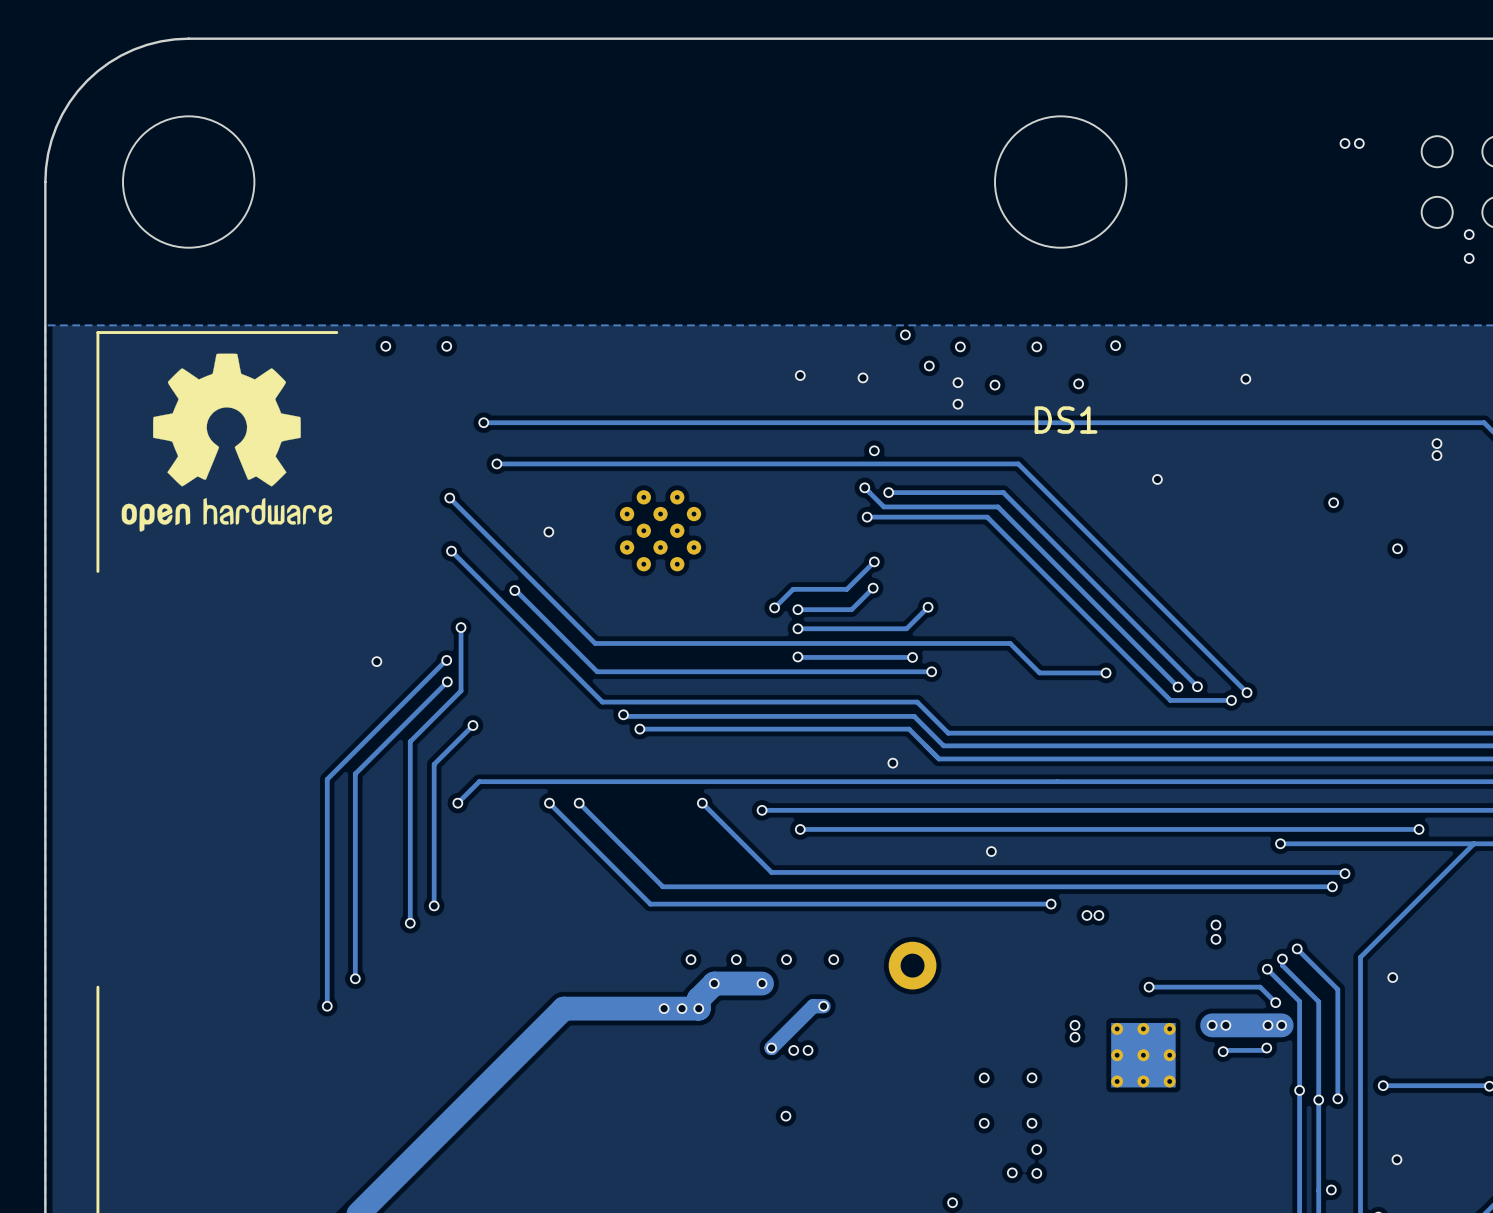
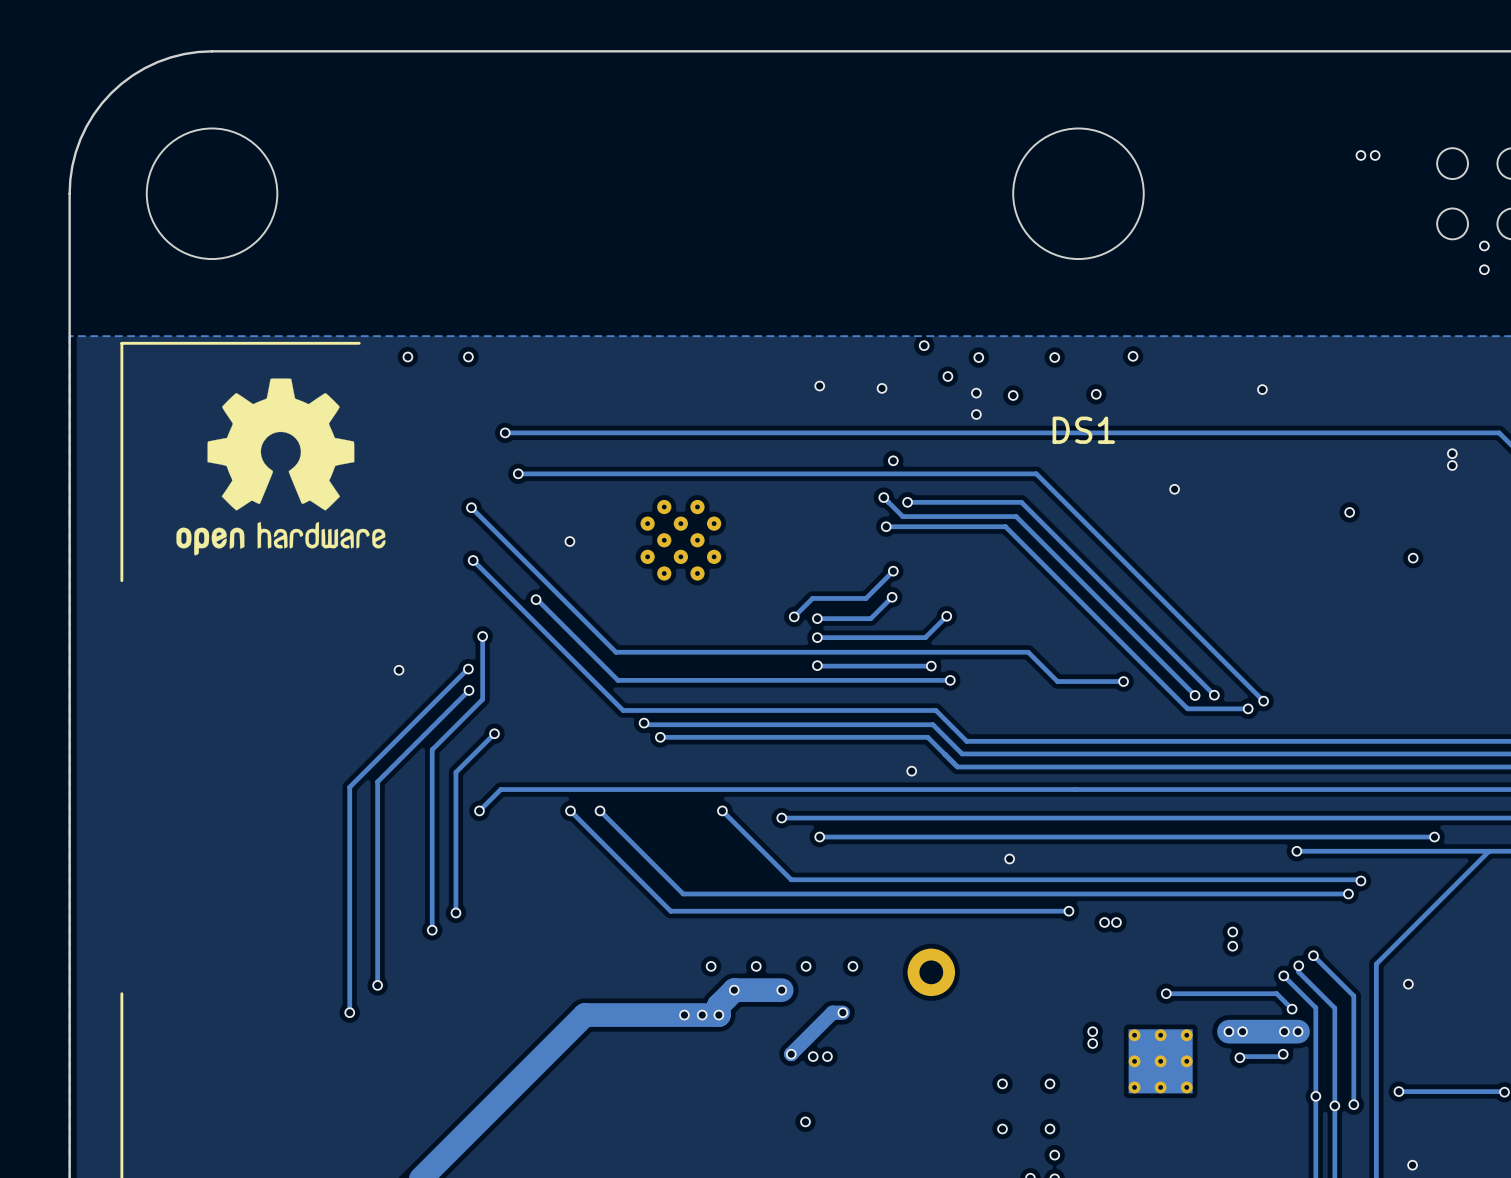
drawing position: (226, 442) -> (280, 466)

